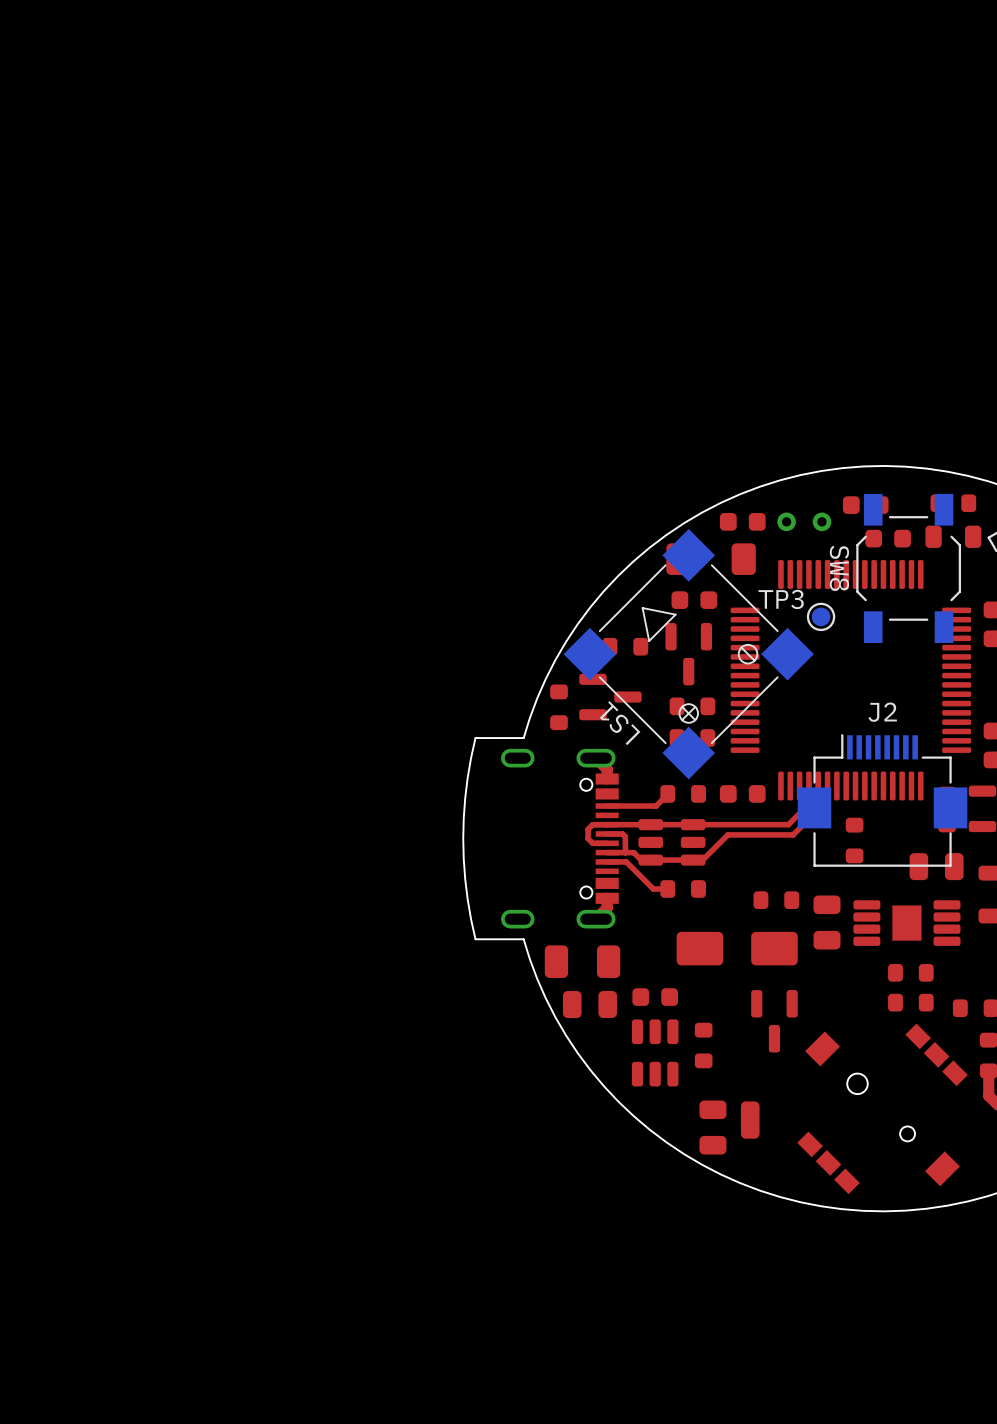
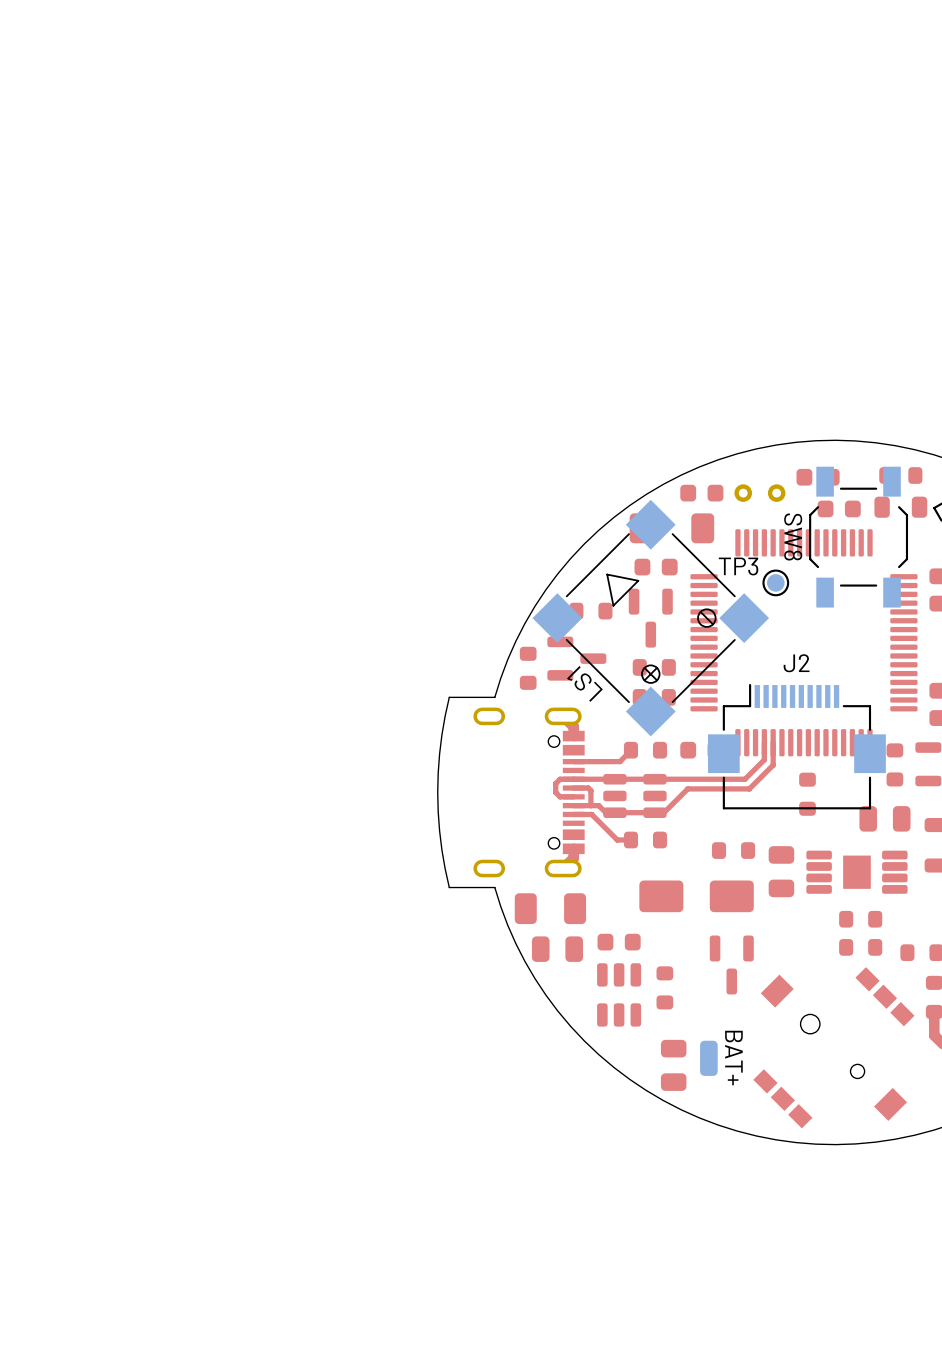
J2 footprint: [797, 734, 968, 867] -> [708, 683, 886, 810]
part side: top (750, 1120) -> bottom (708, 1058)
text: none -> BAT+ (733, 1058)

